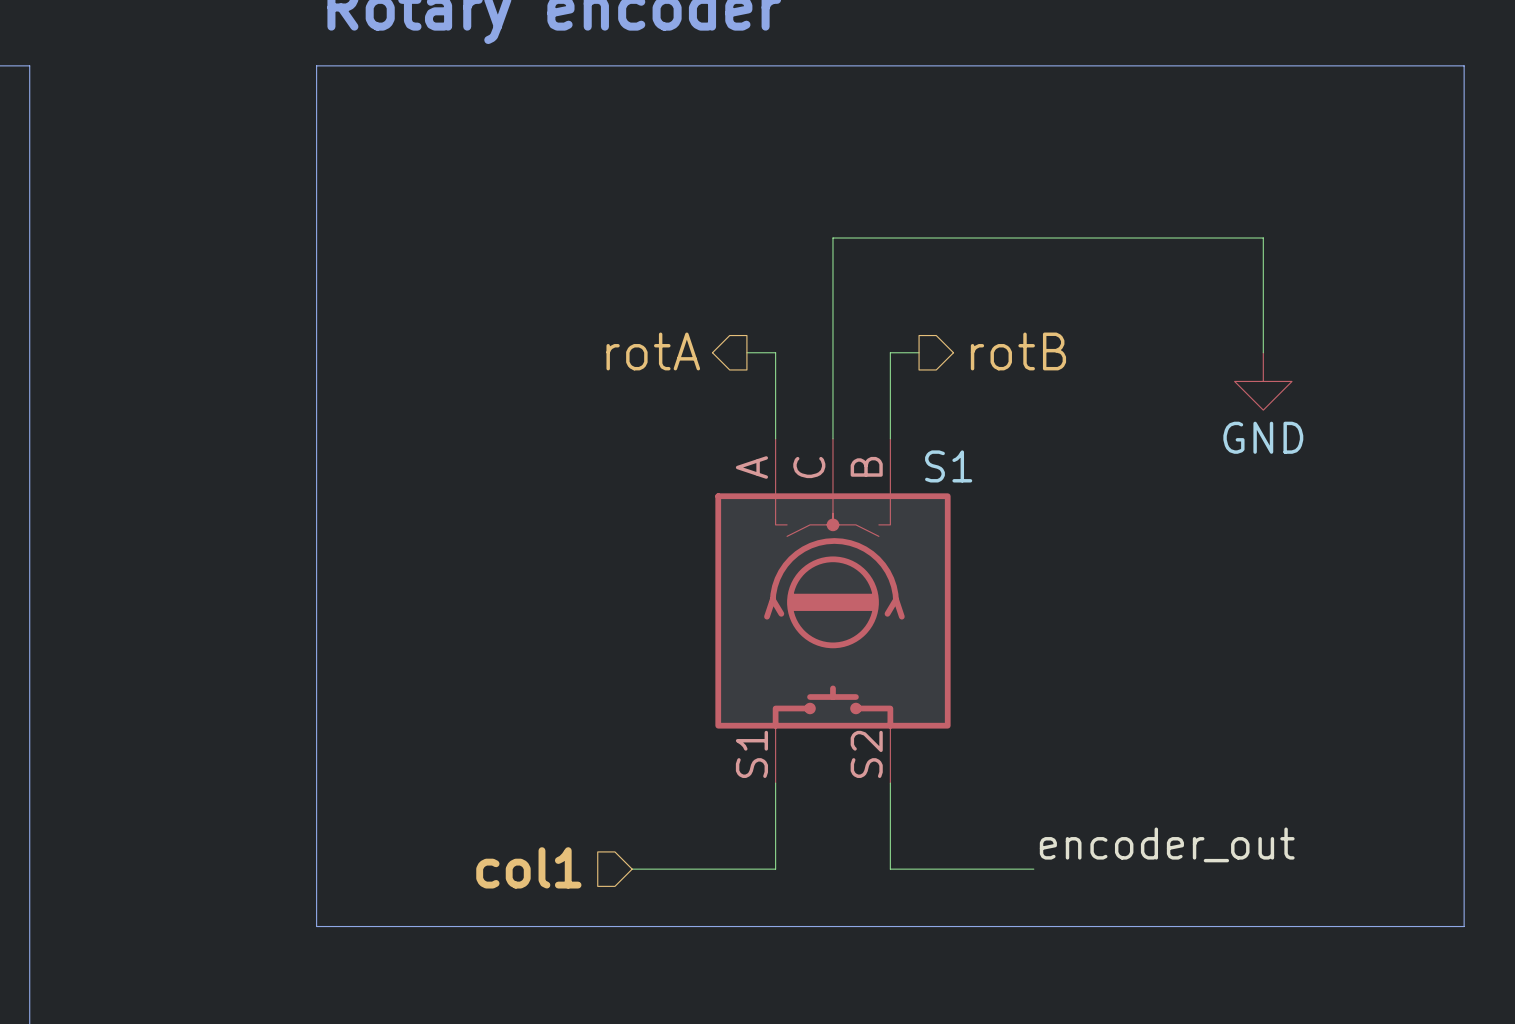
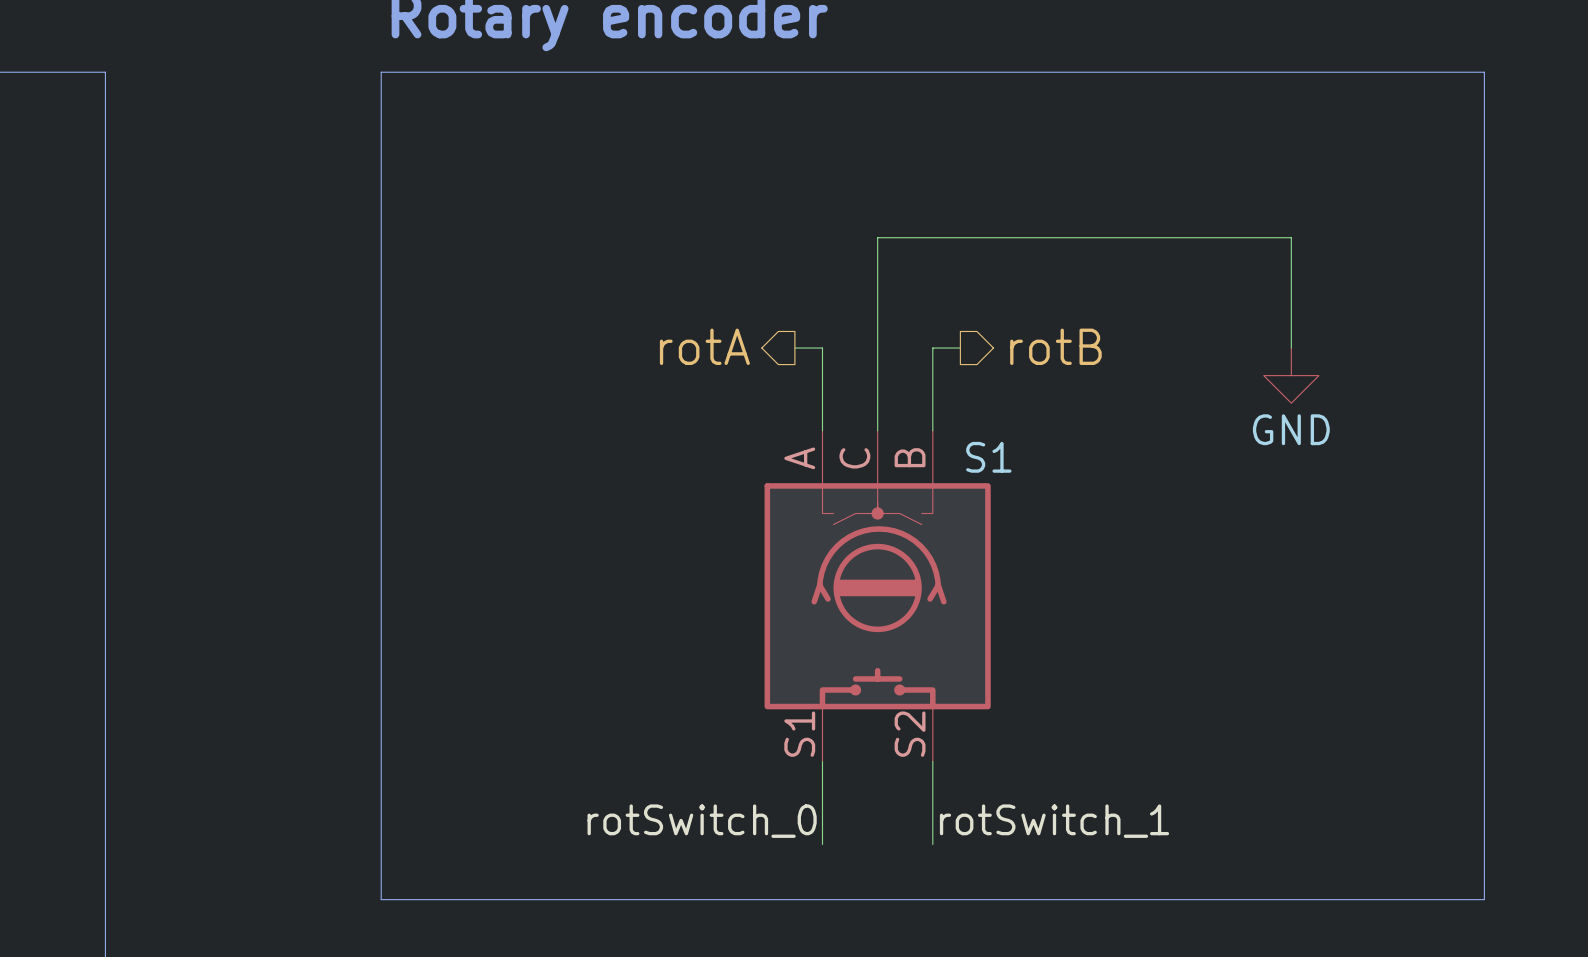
label: none -> rotSwitch_0 (702, 821)
label: none -> rotSwitch_1 (1054, 821)
label: encoder_out (1167, 844) -> none
hierarchical label: col1 (528, 867) -> none
wire: (632, 869) (775, 869) -> none
wire: (890, 869) (1033, 869) -> none

